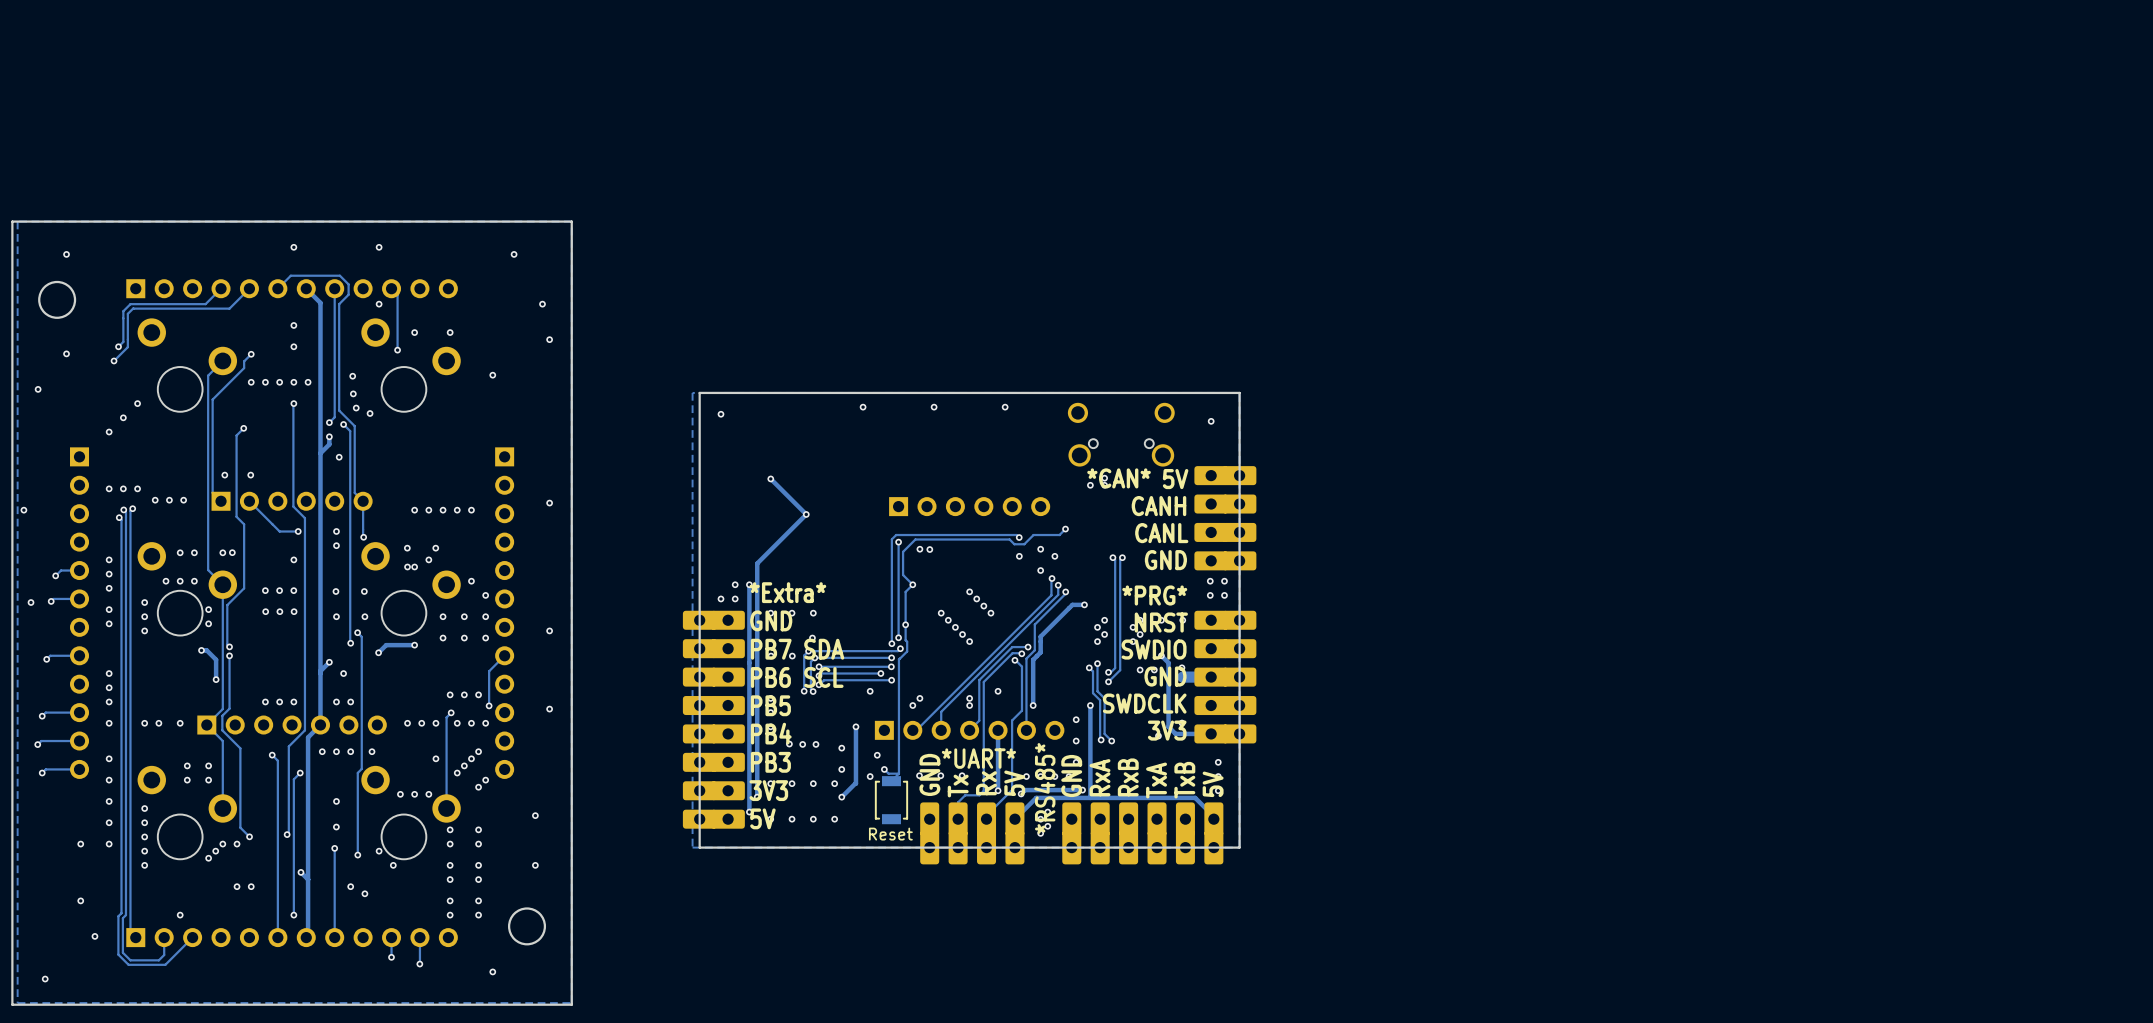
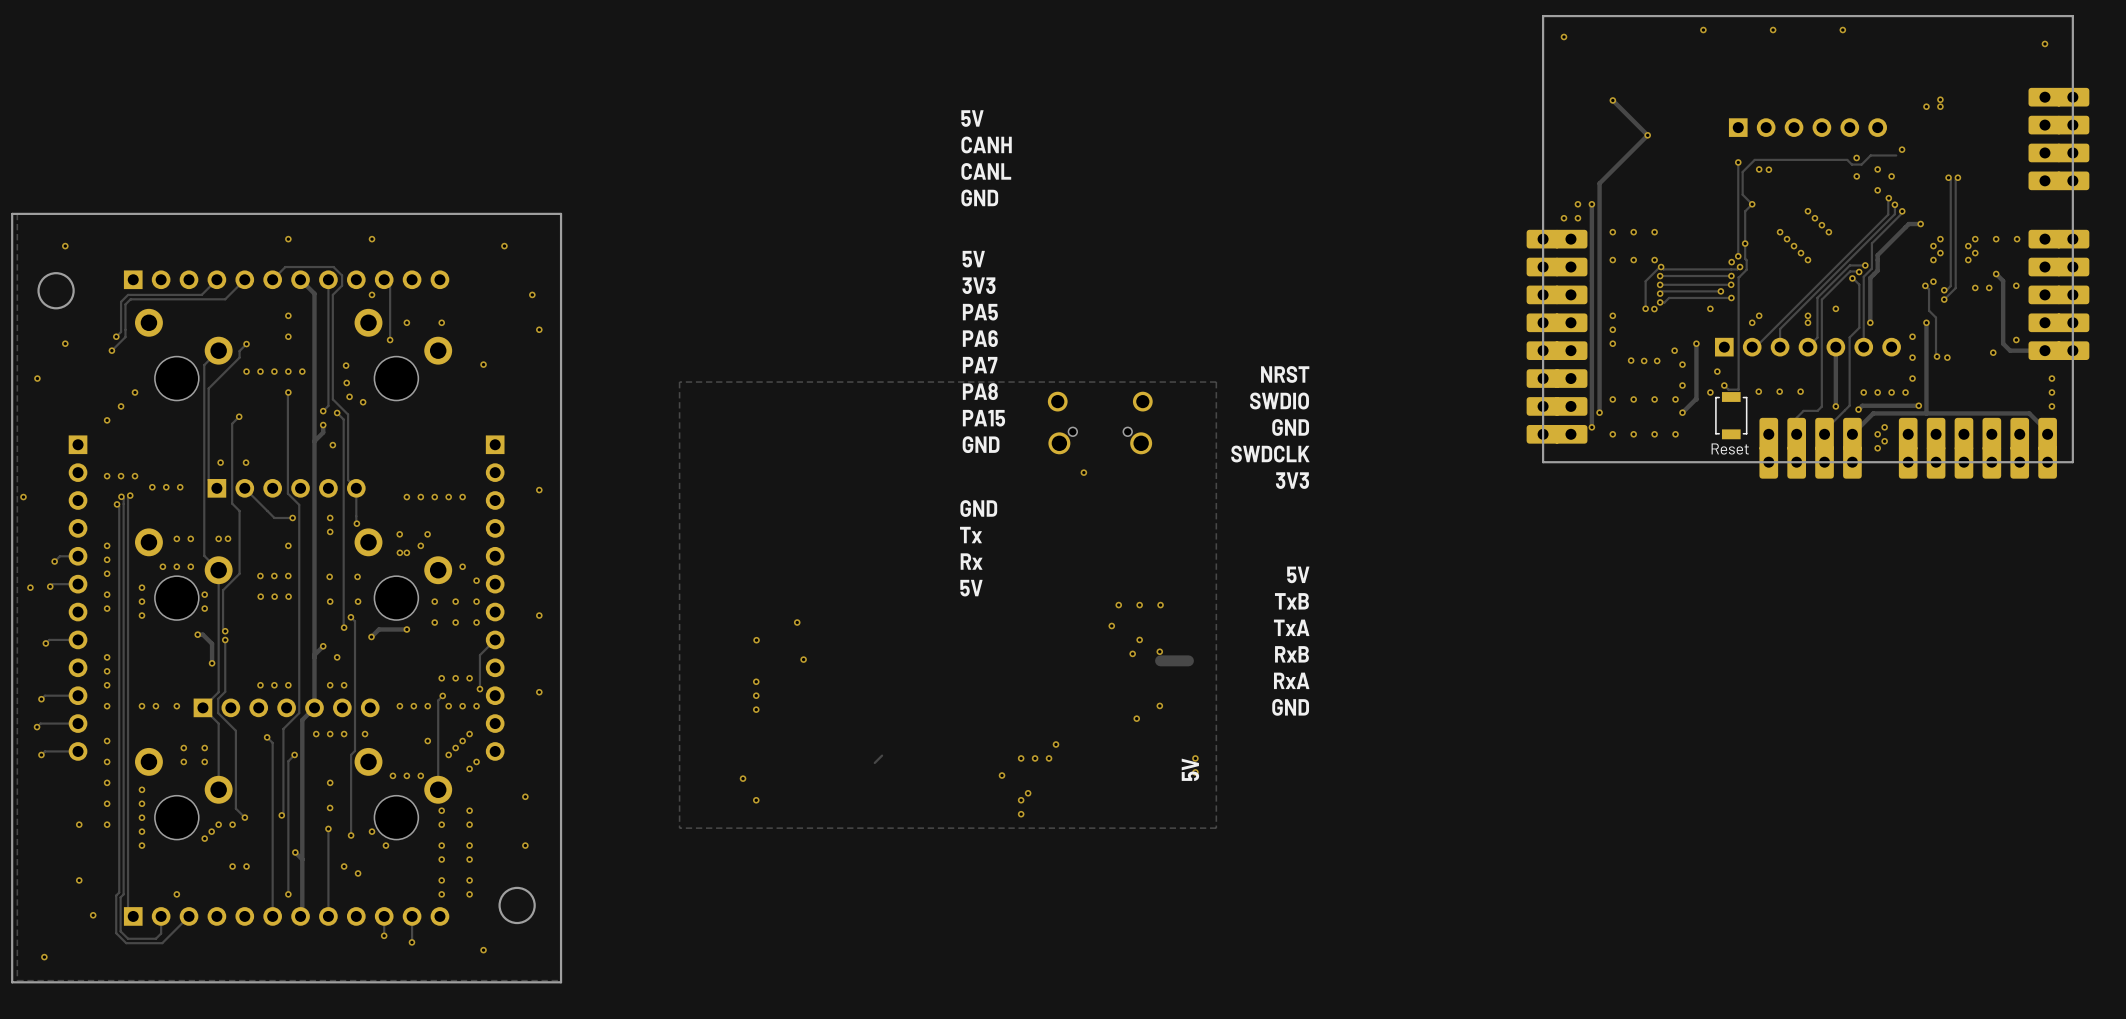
board edge: none -> (2072, 16) (1543, 16) (1543, 462) (2072, 462) (2072, 16)
via: none -> (1703, 30)
via: none -> (1773, 30)
via: none -> (1842, 30)
via: none -> (1564, 36)
via: none -> (2044, 43)
track: none -> (1612, 100) (1647, 135) (1599, 183) (1599, 412)
via: none -> (1612, 100)
via: none -> (1940, 99)
via: none -> (1926, 106)
via: none -> (1940, 106)
text: none -> 5V (972, 118)
part: none -> (1807, 127)
via: none -> (1647, 135)
part: none -> (2058, 139)
text: none -> CANH (986, 144)
via: none -> (1902, 149)
track: none -> (1896, 155) (1870, 155) (1861, 164) (1851, 164) (1847, 159) (1754, 159) (1742, 172) (1742, 194) (1752, 204) (1745, 211) (1746, 269) (1738, 277) (1738, 389) (1728, 389) (1724, 385)
via: none -> (1856, 157)
track: none -> (1738, 162) (1738, 256)
via: none -> (1738, 162)
via: none -> (1759, 169)
via: none -> (1768, 169)
via: none -> (1877, 169)
text: none -> CANL (986, 171)
via: none -> (1856, 176)
via: none -> (1891, 176)
track: none -> (1948, 177) (1950, 179) (1950, 286) (1944, 290)
via: none -> (1948, 177)
track: none -> (1957, 177) (1955, 179) (1955, 288) (1944, 299)
via: none -> (1957, 177)
via: none -> (1877, 190)
text: none -> GND (979, 197)
track: none -> (1888, 198) (1888, 214) (1755, 347) (1752, 347)
via: none -> (1888, 198)
via: none -> (1577, 204)
track: none -> (1591, 204) (1591, 427)
via: none -> (1591, 204)
via: none -> (1752, 204)
track: none -> (1894, 204) (1894, 214) (1780, 329) (1780, 347)
via: none -> (1894, 204)
via: none -> (1807, 211)
track: none -> (1902, 211) (1871, 243) (1871, 268) (1863, 276) (1863, 347)
via: none -> (1902, 211)
via: none -> (1564, 218)
via: none -> (1577, 218)
via: none -> (1814, 218)
track: none -> (1920, 224) (1908, 224) (1877, 255) (1877, 270) (1870, 277) (1870, 322)
via: none -> (1920, 224)
via: none -> (1821, 225)
via: none -> (1612, 232)
via: none -> (1633, 232)
via: none -> (1654, 232)
via: none -> (1780, 232)
via: none -> (1828, 232)
via: none -> (1787, 239)
via: none -> (1940, 239)
via: none -> (1975, 239)
via: none -> (1996, 239)
via: none -> (2017, 239)
via: none -> (1745, 243)
via: none -> (1794, 246)
via: none -> (1933, 246)
via: none -> (1968, 246)
via: none -> (1801, 253)
via: none -> (1940, 253)
via: none -> (1975, 253)
via: none -> (1738, 256)
text: none -> 5V (973, 259)
via: none -> (1612, 260)
via: none -> (1633, 260)
via: none -> (1654, 260)
via: none -> (1807, 260)
via: none -> (1933, 260)
via: none -> (1968, 260)
via: none -> (1731, 262)
track: none -> (1865, 265) (1849, 265) (1817, 297) (1817, 337) (1807, 347)
via: none -> (1865, 265)
via: none -> (1661, 267)
track: none -> (1740, 267) (1737, 269) (1663, 269) (1659, 267) (1645, 281) (1645, 308)
via: none -> (1740, 267)
track: none -> (1859, 272) (1850, 271) (1821, 299) (1821, 406) (1817, 410) (1803, 410) (1796, 417) (1796, 431)
via: none -> (1859, 272)
track: none -> (1996, 273) (2003, 280) (2003, 343) (2010, 350) (2044, 350)
via: none -> (1996, 273)
via: none -> (1660, 276)
track: none -> (1731, 276) (1660, 276)
via: none -> (1731, 276)
track: none -> (1852, 278) (1859, 284) (1859, 327) (1849, 337) (1849, 405) (1824, 431)
via: none -> (1852, 278)
via: none -> (1933, 281)
via: none -> (1660, 284)
track: none -> (1731, 284) (1660, 284)
via: none -> (1731, 284)
text: none -> 3V3 (978, 285)
track: none -> (1925, 285) (1929, 289) (1929, 310) (1936, 317) (1937, 356)
via: none -> (1925, 285)
via: none -> (2016, 285)
via: none -> (1975, 287)
via: none -> (1989, 287)
via: none -> (1944, 290)
track: none -> (1720, 291) (1662, 291) (1660, 293)
via: none -> (1720, 291)
via: none -> (1660, 293)
part: none -> (2058, 294)
track: none -> (1731, 297) (1669, 297) (1664, 302) (1660, 302)
via: none -> (1731, 297)
via: none -> (1944, 299)
via: none -> (1660, 302)
via: none -> (1645, 308)
via: none -> (1654, 309)
via: none -> (1710, 308)
via: none -> (1835, 308)
text: none -> PA5 (980, 312)
via: none -> (1612, 315)
via: none -> (1759, 315)
via: none -> (1807, 315)
via: none -> (1752, 322)
via: none -> (1807, 322)
via: none -> (1870, 322)
track: none -> (1926, 322) (1926, 413)
via: none -> (1926, 322)
via: none -> (1612, 329)
part: none -> (1557, 336)
via: none -> (1912, 336)
text: none -> PA6 (980, 338)
via: none -> (2016, 339)
via: none -> (1612, 343)
track: none -> (1696, 343) (1696, 399) (1682, 412)
via: none -> (1696, 343)
part: none -> (1807, 347)
track: none -> (1835, 347) (1835, 406)
via: none -> (1674, 350)
via: none -> (1993, 352)
via: none -> (1937, 356)
via: none -> (1912, 357)
via: none -> (1947, 357)
via: none -> (1631, 360)
via: none -> (1644, 360)
via: none -> (1657, 360)
text: none -> PA7 (980, 365)
via: none -> (1682, 364)
via: none -> (1717, 371)
via: none -> (1912, 378)
via: none -> (2051, 378)
board edge: (1239, 392) (699, 392) (699, 847) (1239, 847) (1239, 392) -> none
via: none -> (1682, 385)
via: none -> (1724, 385)
text: none -> PA8 (980, 391)
via: none -> (1758, 391)
via: none -> (1779, 391)
via: none -> (1800, 391)
via: none -> (1710, 392)
via: none -> (1863, 392)
via: none -> (1877, 392)
via: none -> (1891, 392)
via: none -> (1905, 392)
via: none -> (2051, 392)
via: (863, 407) -> none
via: (934, 407) -> none
via: (1005, 407) -> none
via: none -> (1612, 399)
via: none -> (1633, 399)
via: none -> (1654, 399)
via: none -> (1675, 399)
via: (720, 414) -> none
via: none -> (1835, 406)
track: none -> (1918, 405) (1862, 405) (1858, 409)
via: none -> (1918, 405)
via: none -> (2051, 406)
via: (1211, 421) -> none
via: none -> (1858, 409)
via: none -> (1599, 412)
via: none -> (1682, 412)
part: none -> Reset (1731, 415)
text: none -> PA15 (983, 418)
text: none -> GND (1290, 427)
via: none -> (1591, 427)
via: none -> (1884, 427)
via: none -> (1612, 434)
via: none -> (1633, 434)
via: none -> (1654, 434)
via: none -> (1675, 434)
via: none -> (1877, 434)
track: none -> (2047, 434) (2047, 431) (2029, 413) (1873, 413) (1852, 434)
via: none -> (1884, 441)
text: none -> GND (981, 444)
part: none -> (1810, 448)
via: none -> (1877, 448)
part: none -> (1977, 448)
track: (770, 478) (806, 514) (757, 563) (757, 797) -> none
via: (770, 478) -> none
via: (1104, 478) -> none
text: *CAN* (1119, 478) -> none
text: 5V (1175, 479) -> none
via: (1090, 485) -> none
text: none -> 3V3 (1292, 480)
part: (969, 506) -> none
text: CANH (1158, 506) -> none
via: (806, 514) -> none
part: (1225, 518) -> none
text: none -> GND (978, 508)
track: (1065, 529) (1059, 535) (1033, 535) (1024, 544) (1014, 544) (1009, 539) (915, 539) (903, 551) (903, 575) (912, 584) (905, 591) (907, 651) (898, 659) (898, 773) (888, 773) (884, 769) -> none
via: (1065, 529) -> none
text: CANL (1161, 533) -> none
track: (1019, 537) (1016, 535) (896, 535) (891, 539) (891, 643) -> none
via: (1019, 537) -> none
track: (898, 542) (898, 637) -> none
via: (898, 542) -> none
via: (919, 549) -> none
via: (929, 549) -> none
via: (1040, 549) -> none
via: (1019, 556) -> none
via: (1054, 556) -> none
track: (1112, 557) (1115, 559) (1115, 668) (1108, 672) -> none
via: (1112, 557) -> none
track: (1122, 557) (1120, 559) (1120, 670) (1108, 681) -> none
via: (1122, 557) -> none
text: GND (1165, 560) -> none
via: (1040, 570) -> none
track: (1052, 578) (1051, 595) (916, 730) (912, 730) -> none
via: (1052, 578) -> none
via: (1210, 581) -> none
via: (1224, 581) -> none
via: (735, 584) -> none
track: (749, 584) (749, 812) -> none
via: (749, 584) -> none
via: (912, 584) -> none
track: (1058, 585) (1058, 594) (941, 711) (941, 730) -> none
via: (1058, 585) -> none
text: none -> 5V (1298, 574)
via: (969, 591) -> none
track: (1065, 591) (1034, 624) (1034, 650) (1026, 658) (1026, 730) -> none
via: (1065, 591) -> none
text: *Extra* (787, 592) -> none
text: *PRG* (1154, 595) -> none
via: (1210, 595) -> none
via: (1224, 595) -> none
via: (720, 598) -> none
via: (735, 598) -> none
via: (976, 598) -> none
text: none -> 5V (971, 588)
track: (1084, 604) (1072, 604) (1040, 636) (1040, 652) (1033, 659) (1033, 705) -> none
via: (1084, 604) -> none
via: (983, 606) -> none
via: (770, 613) -> none
via: (792, 613) -> none
via: (813, 613) -> none
via: (941, 613) -> none
via: (990, 613) -> none
text: GND (771, 620) -> none
via: (948, 620) -> none
via: (1104, 620) -> none
text position: NRST (1161, 622) -> NRST (1285, 374)
via: (905, 624) -> none
via: (955, 627) -> none
via: (1097, 627) -> none
via: (1133, 627) -> none
via: (962, 634) -> none
via: (1104, 634) -> none
via: (1140, 634) -> none
via: (898, 637) -> none
via: (969, 641) -> none
via: (1097, 641) -> none
via: (891, 643) -> none
track: (1028, 647) (1012, 647) (979, 680) (979, 720) (969, 730) -> none
via: (1028, 647) -> none
track: (900, 648) (897, 651) (808, 651) (804, 655) (804, 691) -> none
via: (900, 648) -> none
text: PB7 SDA (797, 649) -> none
text position: SWDIO (1154, 649) -> SWDIO (1279, 401)
via: (808, 651) -> none
track: (1021, 653) (1012, 653) (983, 681) (983, 790) (979, 795) (965, 795) (958, 802) (958, 816) -> none
via: (1021, 653) -> none
track: (1161, 655) (1168, 662) (1168, 726) (1175, 733) (1211, 733) -> none
via: (792, 656) -> none
via: (814, 657) -> none
track: (891, 657) (814, 657) (810, 661) (810, 689) (813, 691) -> none
via: (891, 657) -> none
track: (1014, 660) (1021, 666) (1021, 710) (1012, 720) (1012, 789) (986, 816) -> none
via: (1014, 660) -> none
track: (1097, 663) (1097, 691) (1104, 698) (1104, 733) (1111, 741) -> none
via: (1097, 663) -> none
via: (819, 666) -> none
track: (891, 666) (819, 666) -> none
via: (891, 666) -> none
track: (1089, 667) (1093, 671) (1093, 693) (1100, 700) (1101, 739) -> none
via: (1089, 667) -> none
via: (1140, 669) -> none
via: (1108, 672) -> none
track: (880, 673) (821, 673) (818, 675) -> none
via: (880, 673) -> none
text: GND (1165, 676) -> none
text: PB6 SCL (797, 677) -> none
part: (1225, 677) -> none
track: (891, 680) (824, 680) (818, 684) -> none
via: (891, 680) -> none
via: (1108, 681) -> none
via: (818, 684) -> none
via: (804, 691) -> none
via: (813, 691) -> none
via: (870, 691) -> none
via: (998, 691) -> none
via: (919, 698) -> none
via: (969, 698) -> none
text position: SWDCLK (1144, 703) -> SWDCLK (1270, 454)
text: PB5 (770, 705) -> none
via: (912, 705) -> none
via: (969, 705) -> none
via: (1033, 705) -> none
track: (1090, 705) (1090, 797) -> none
via: (1090, 705) -> none
part: (713, 719) -> none
via: (1076, 719) -> none
text: none -> GND (1290, 707)
track: (855, 726) (855, 783) (841, 797) -> none
via: (855, 726) -> none
part: (969, 730) -> none
track: (998, 730) (998, 790) -> none
text: 3V3 (1167, 730) -> none
text: PB4 (771, 733) -> none
via: (1101, 739) -> none
via: (1076, 741) -> none
via: (1111, 741) -> none
via: (789, 744) -> none
via: (802, 744) -> none
via: (815, 744) -> none
via: (841, 748) -> none
via: (877, 755) -> none
text: *UART* (978, 758) -> none
text: PB3 (770, 762) -> none
via: (1218, 762) -> none
via: (841, 769) -> none
via: (884, 769) -> none
text: GND (929, 774) -> none
via: (919, 775) -> none
via: (940, 775) -> none
via: (962, 775) -> none
via: (870, 776) -> none
via: (1026, 776) -> none
text: GND (1071, 776) -> none
text rotation: 0° (1099, 777) -> 90° clockwise (1291, 680)
text position: RxA (1099, 777) -> RxA (1291, 680)
text rotation: 0° (1128, 777) -> 90° clockwise (1291, 654)
text position: RxB (1128, 777) -> RxB (1291, 654)
text rotation: 0° (1156, 780) -> 90° clockwise (1291, 627)
text position: TxA (1156, 780) -> TxA (1291, 627)
text rotation: 0° (1184, 780) -> 90° clockwise (1291, 601)
text position: TxB (1184, 780) -> TxB (1291, 601)
via: (770, 783) -> none
via: (792, 783) -> none
via: (813, 783) -> none
via: (834, 783) -> none
text rotation: 0° (986, 783) -> 90° clockwise (971, 561)
text position: Rx (986, 783) -> Rx (971, 561)
text: 5V (1014, 783) -> none
text rotation: 0° (958, 786) -> 90° clockwise (970, 535)
text position: Tx (958, 786) -> Tx (970, 535)
text: *RS485* (1044, 788) -> none
text: 3V3 (768, 790) -> none
via: (998, 790) -> none
track: (1082, 790) (1025, 790) (1021, 793) -> none
via: (1082, 790) -> none
via: (841, 797) -> none
part: Reset (891, 800) -> none
via: (749, 812) -> none
text: 5V (762, 818) -> none
via: (792, 819) -> none
via: (813, 819) -> none
via: (834, 819) -> none
track: (1213, 819) (1213, 816) (1195, 797) (1036, 797) (1014, 819) -> none
via: (1047, 826) -> none
part: (972, 833) -> none
part: (1142, 833) -> none

